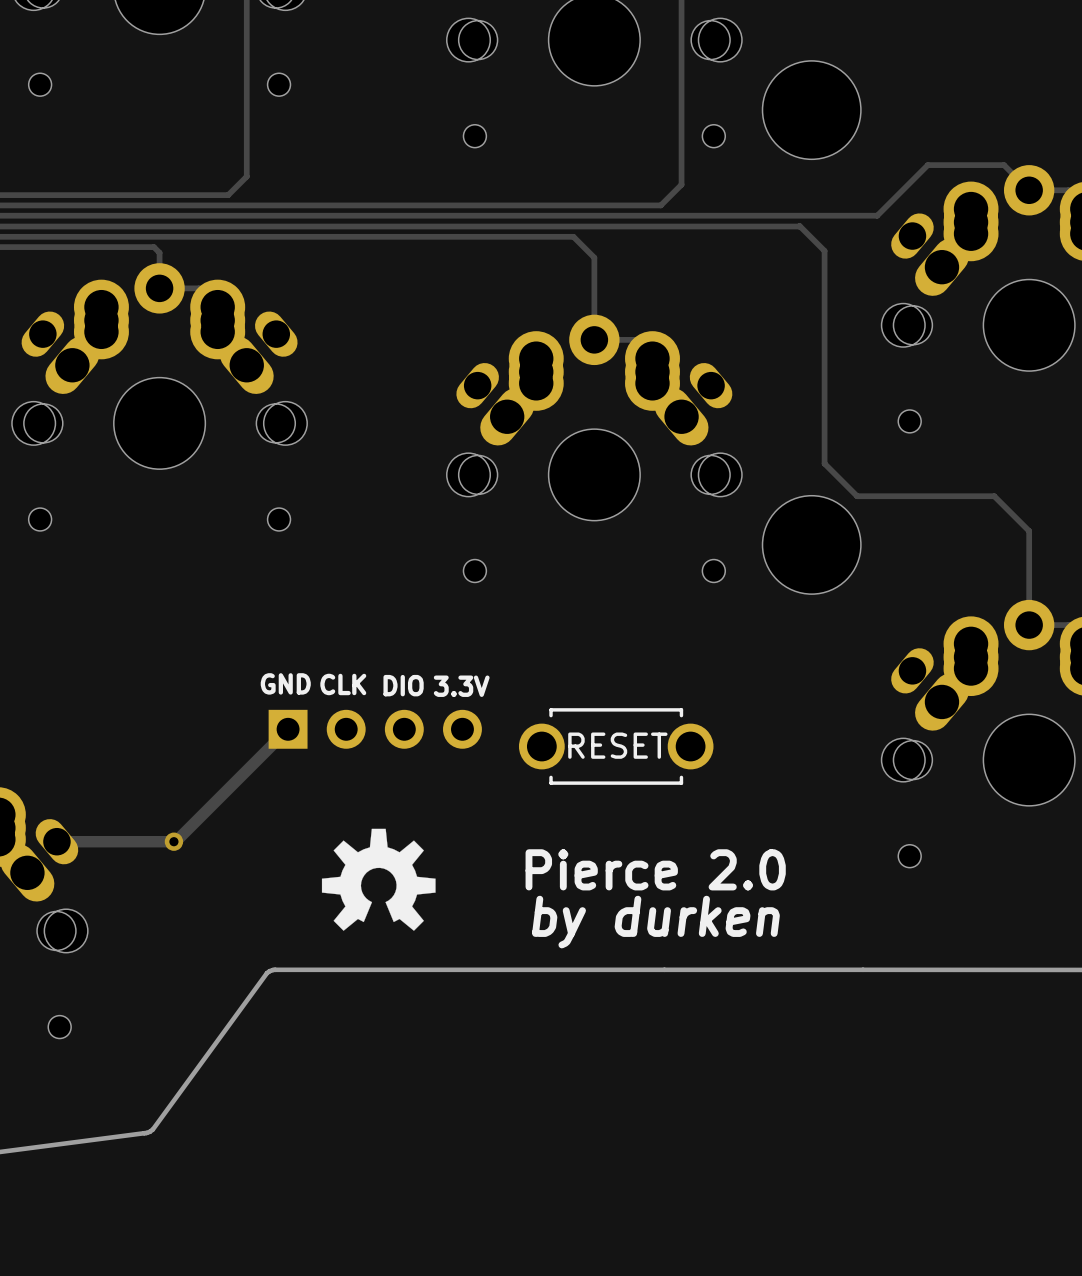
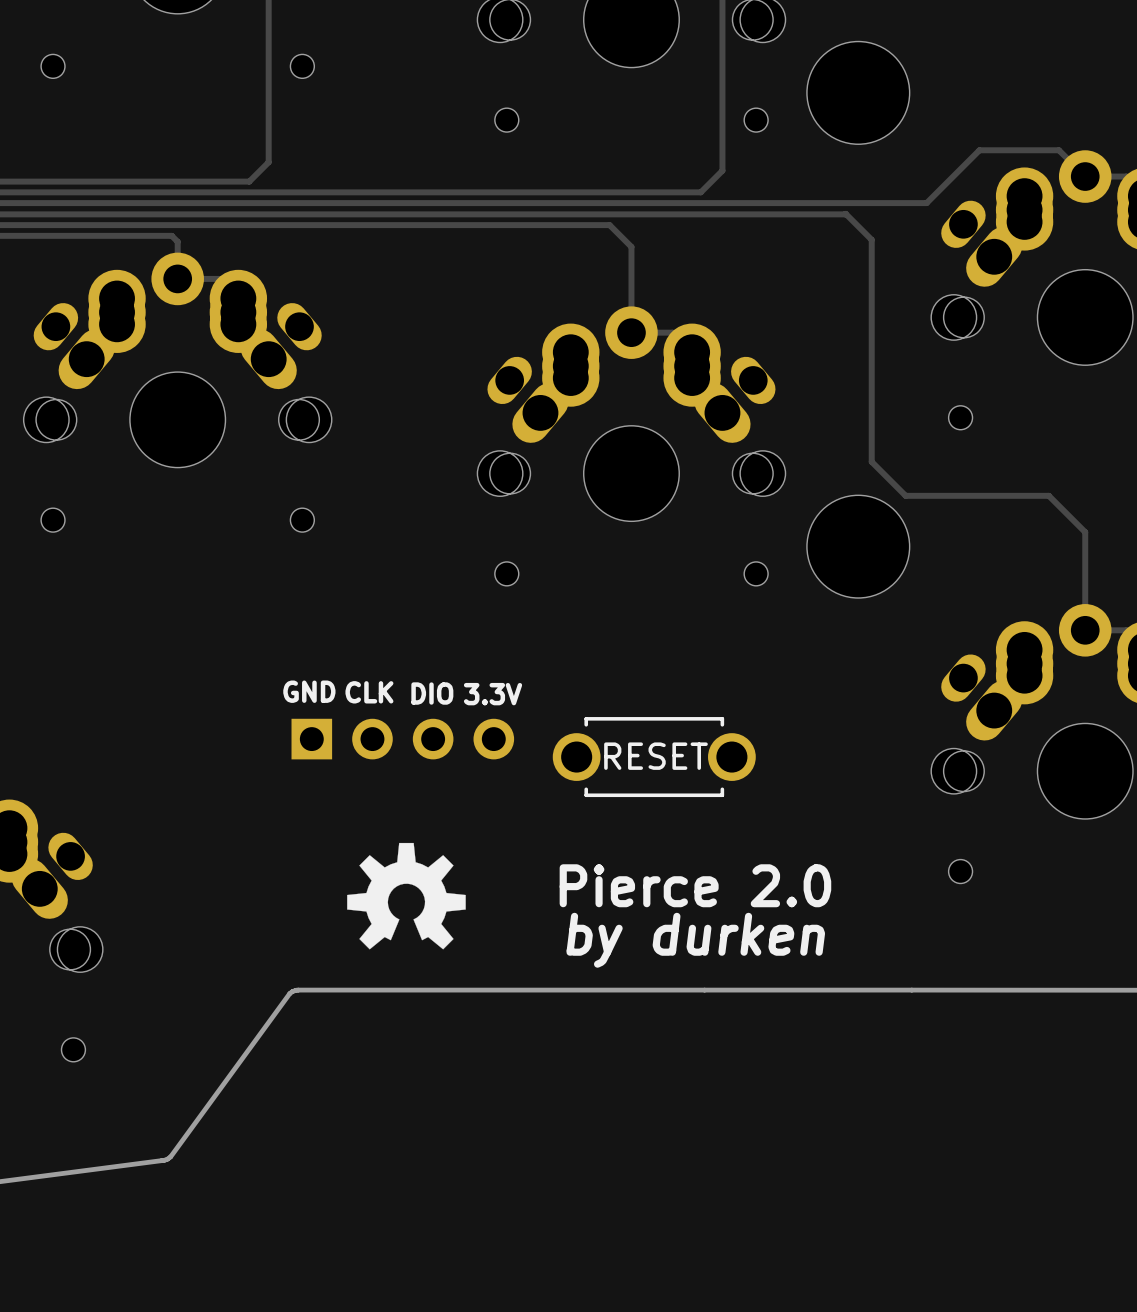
track: (288, 729) (175, 841) -> none
track: (56, 841) (173, 841) -> none
via: (173, 841) -> none

